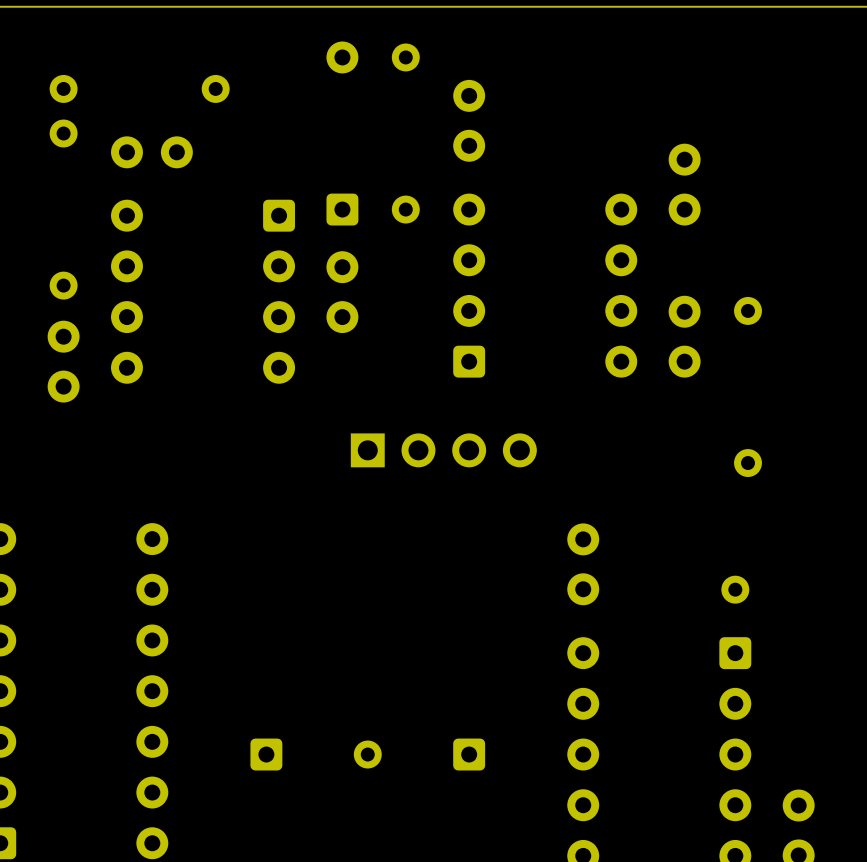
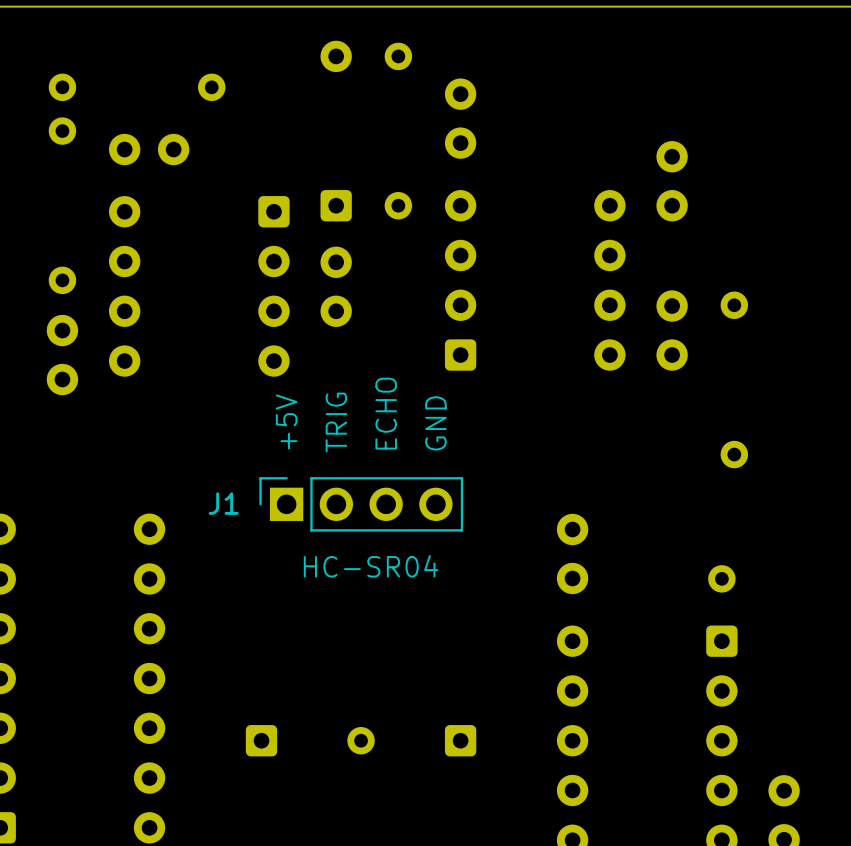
text: none -> ECHO (386, 413)
text: none -> +5V (286, 422)
text: none -> TRIG (336, 422)
text: none -> GND (435, 423)
J1 side: top (443, 450) -> bottom (361, 504)
text: none -> HC-SR04 (371, 566)

